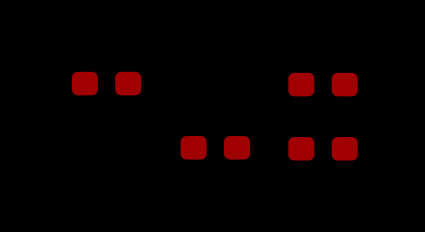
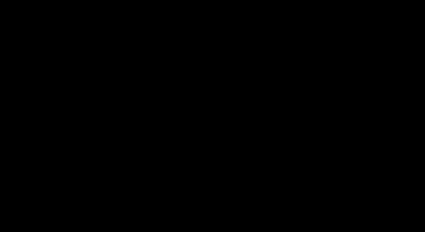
part: (106, 83) -> none
part: (323, 84) -> none
part: (215, 147) -> none
part: (323, 148) -> none

